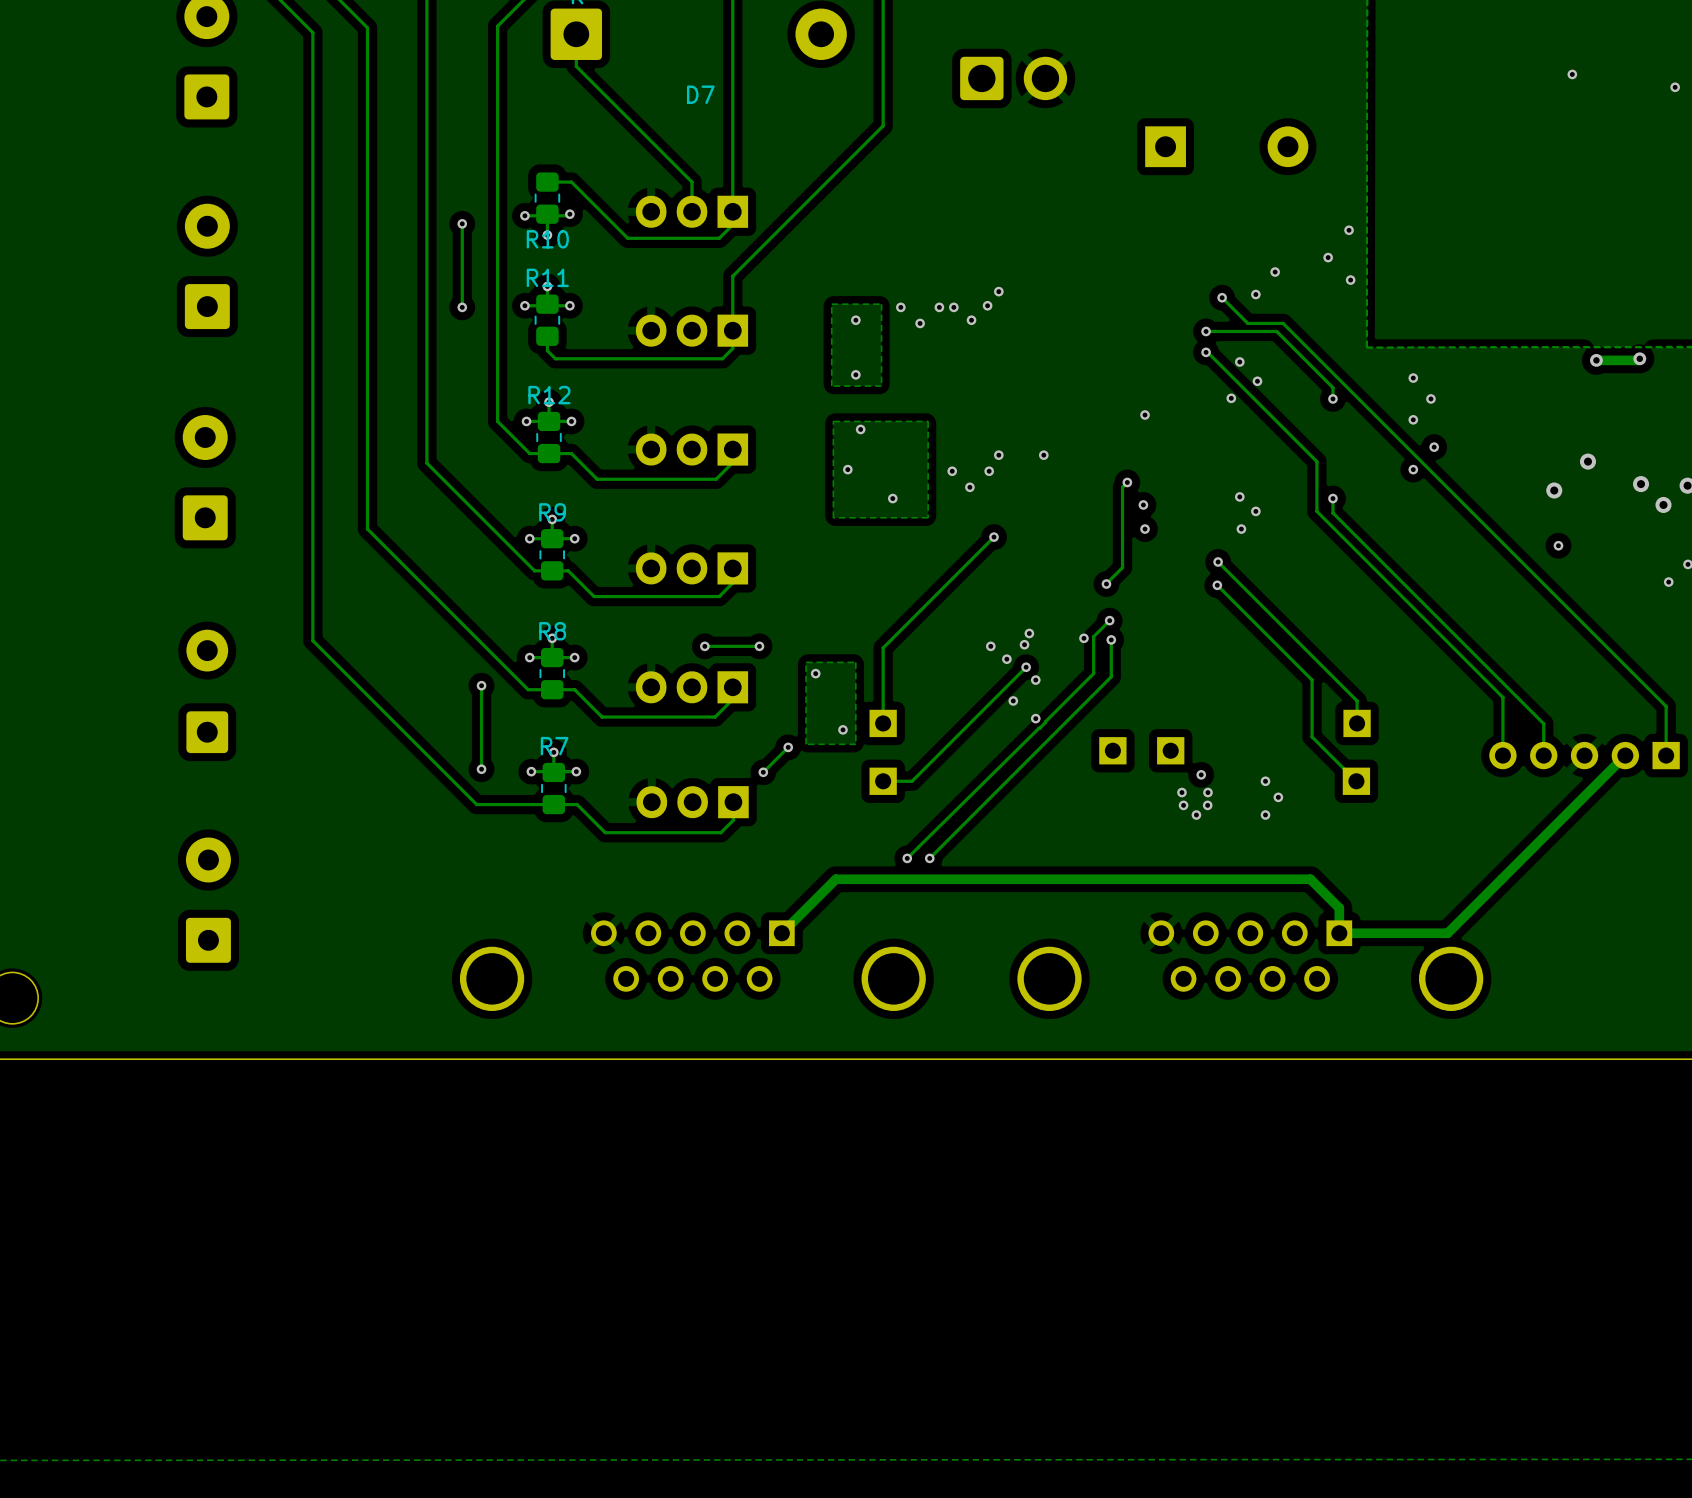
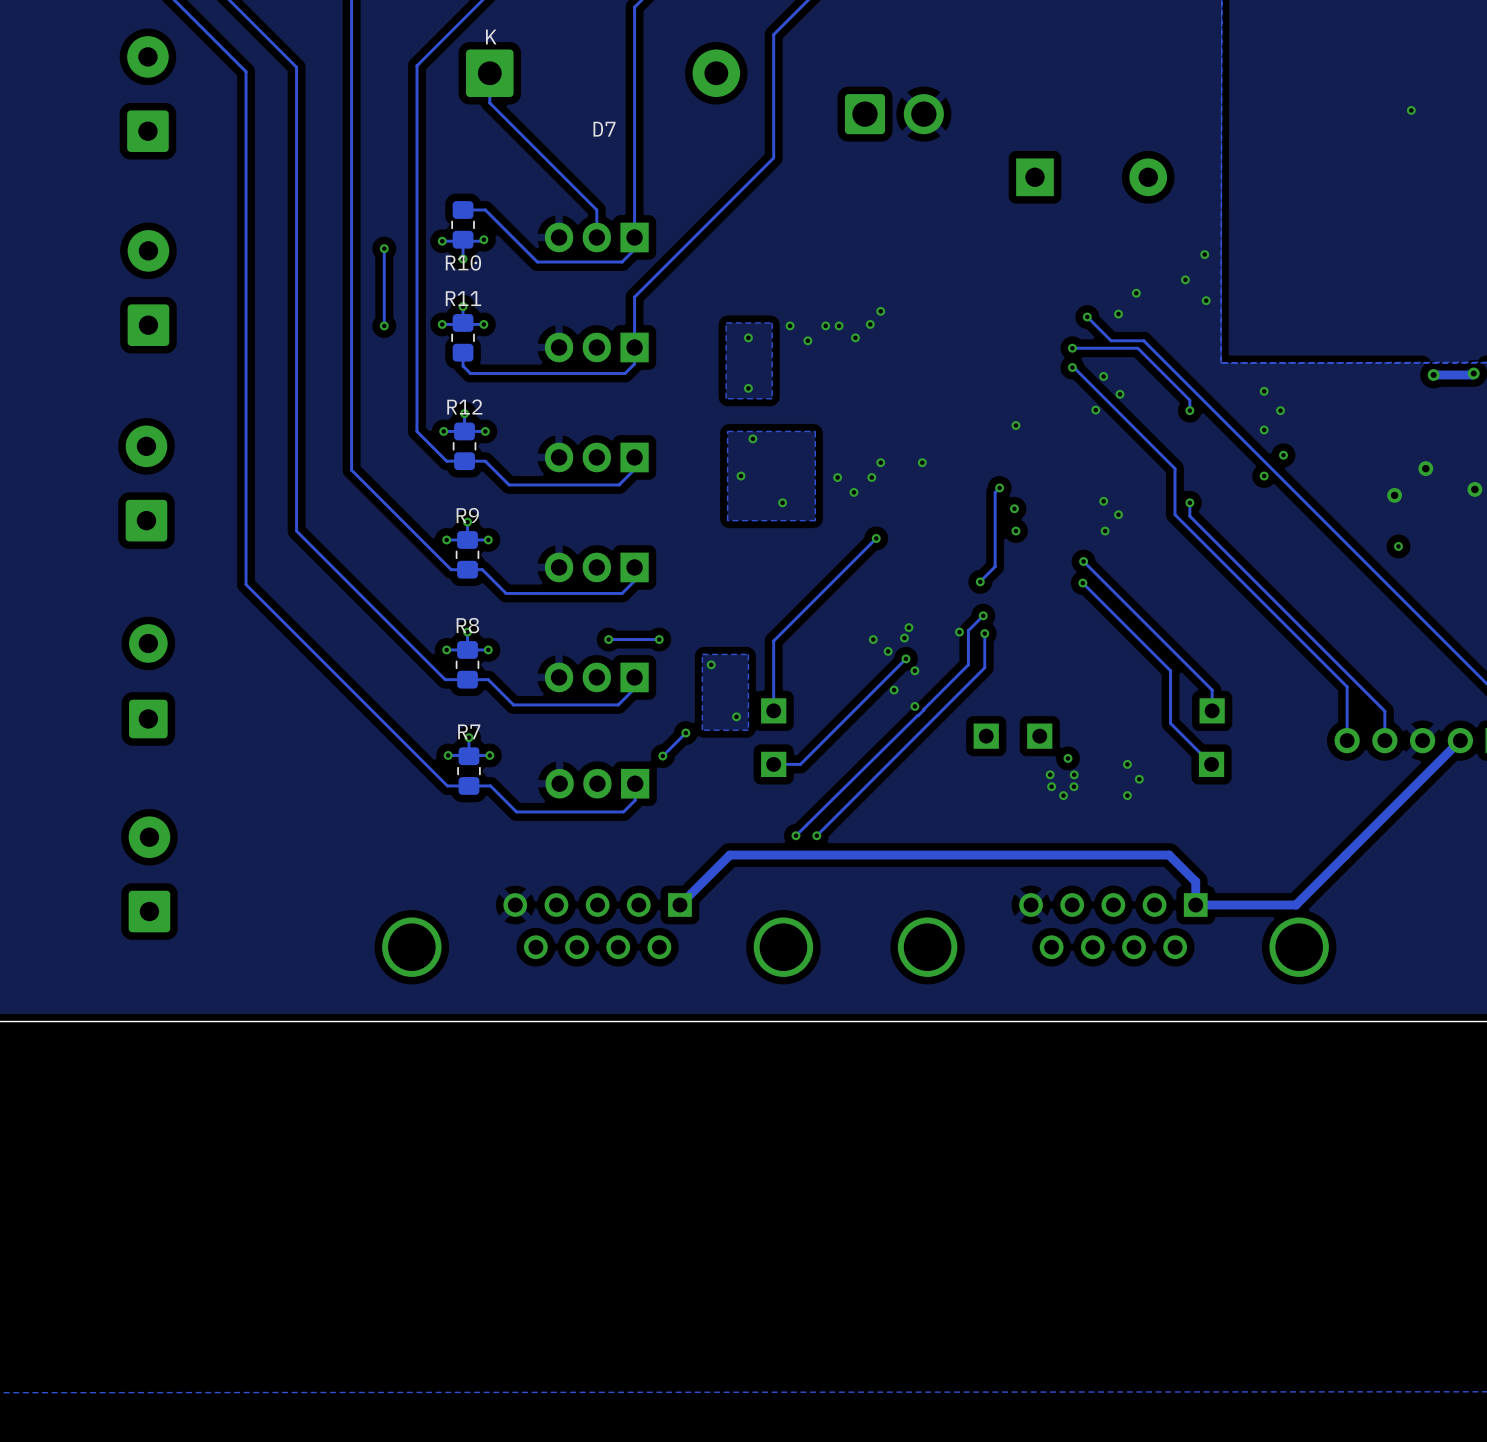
track: (312, 586) (312, 640) (476, 804) (530, 804) -> (246, 584) (447, 785)
via: (481, 685) -> none
track: (481, 687) (481, 769) -> none
via: (481, 769) -> none

